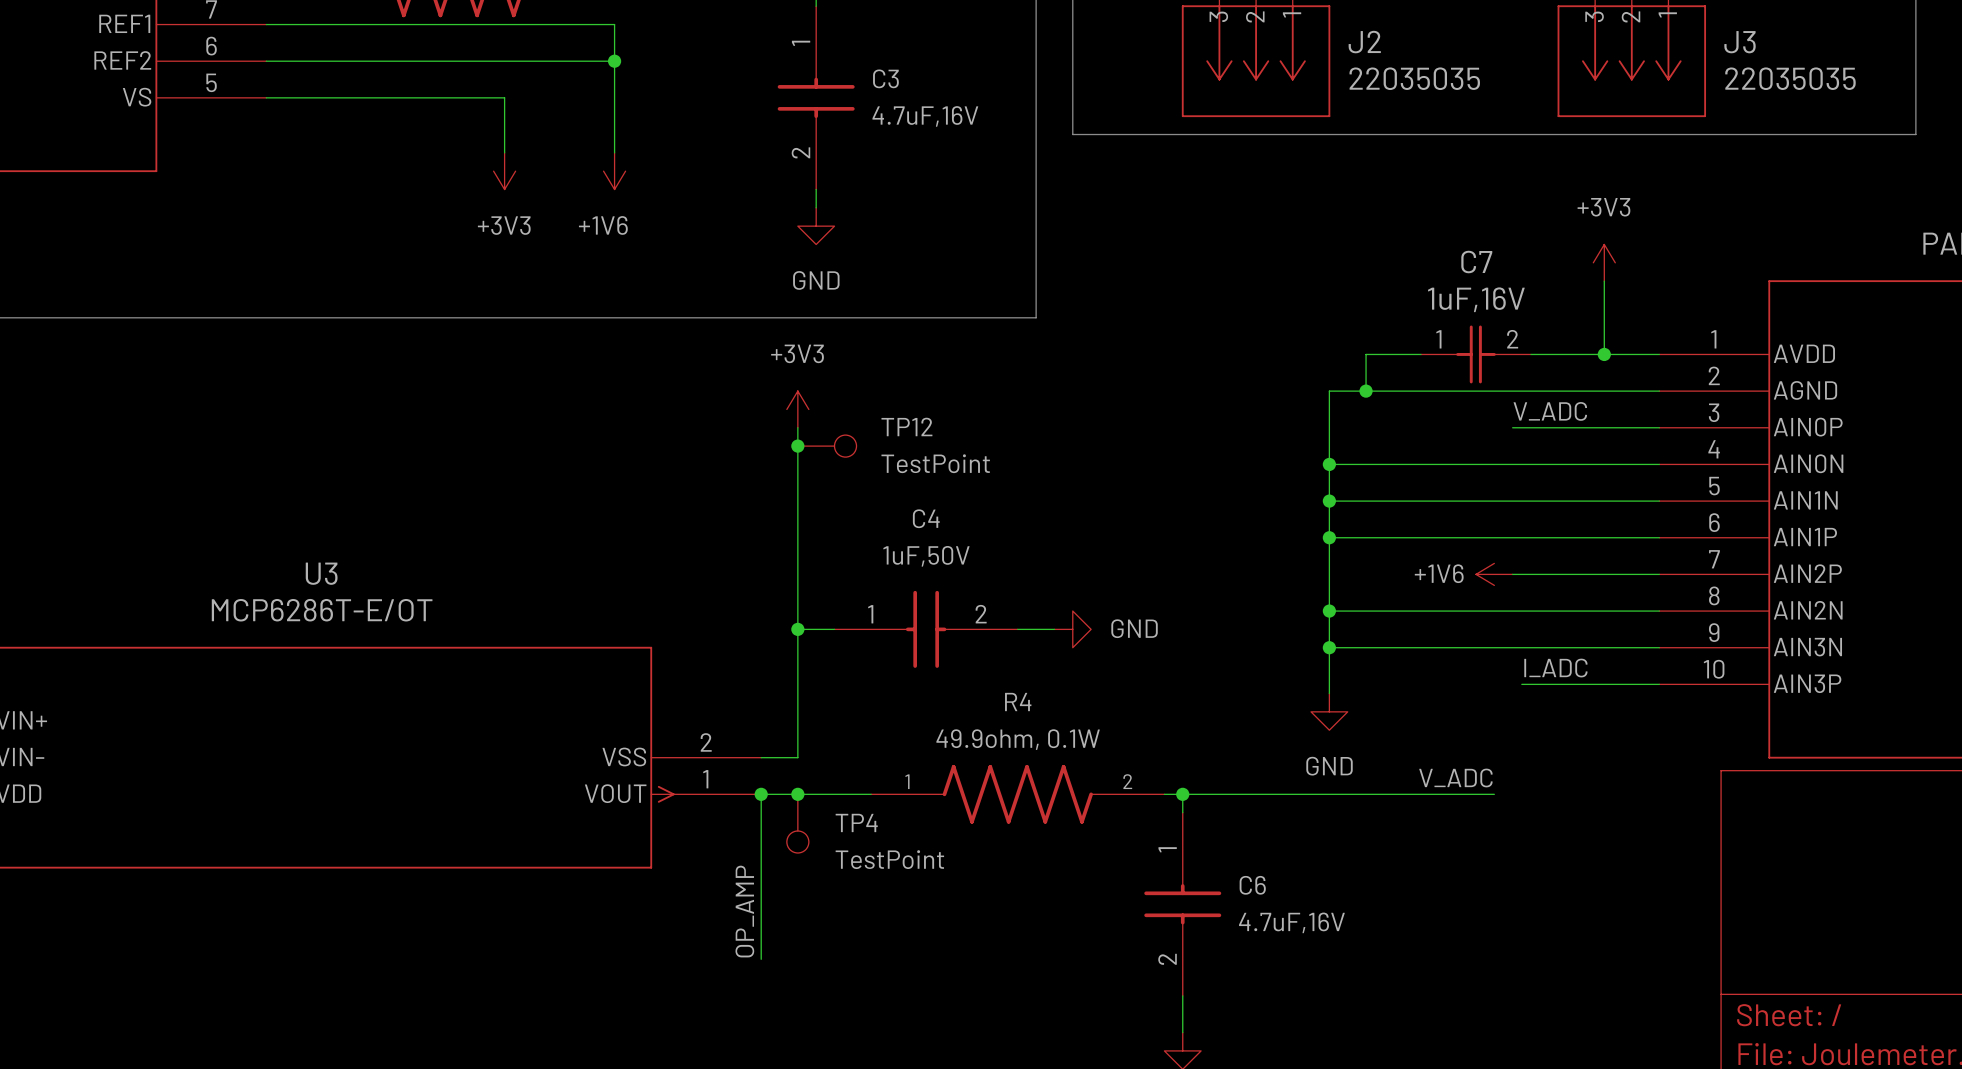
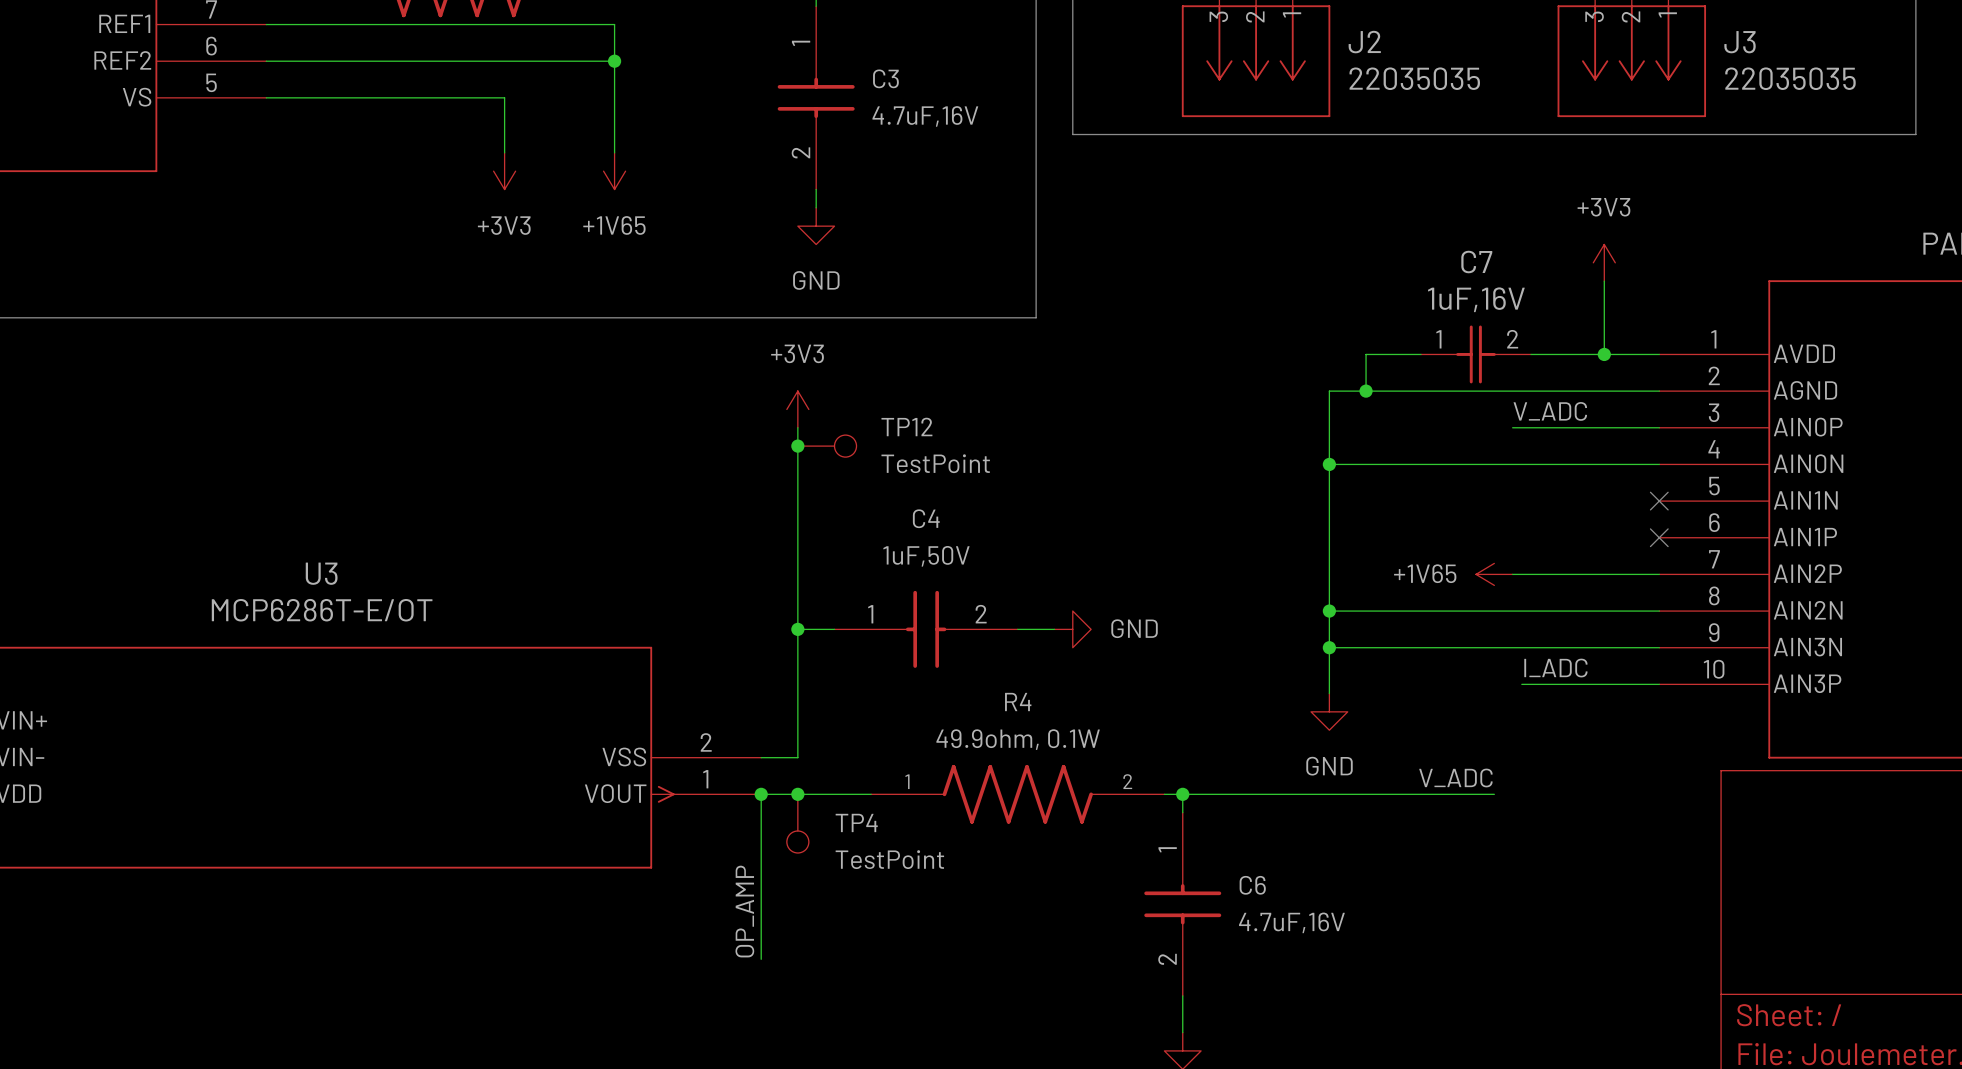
power symbol: +1V6 (614, 171) -> +1V65 (614, 171)
wire: (1329, 501) (1659, 501) -> none
junction: (1329, 501) -> none
no-connect mark: none -> (1659, 501)
wire: (1329, 537) (1659, 537) -> none
junction: (1329, 537) -> none
no-connect mark: none -> (1659, 537)
power symbol: +1V6 (1494, 574) -> +1V65 (1494, 574)

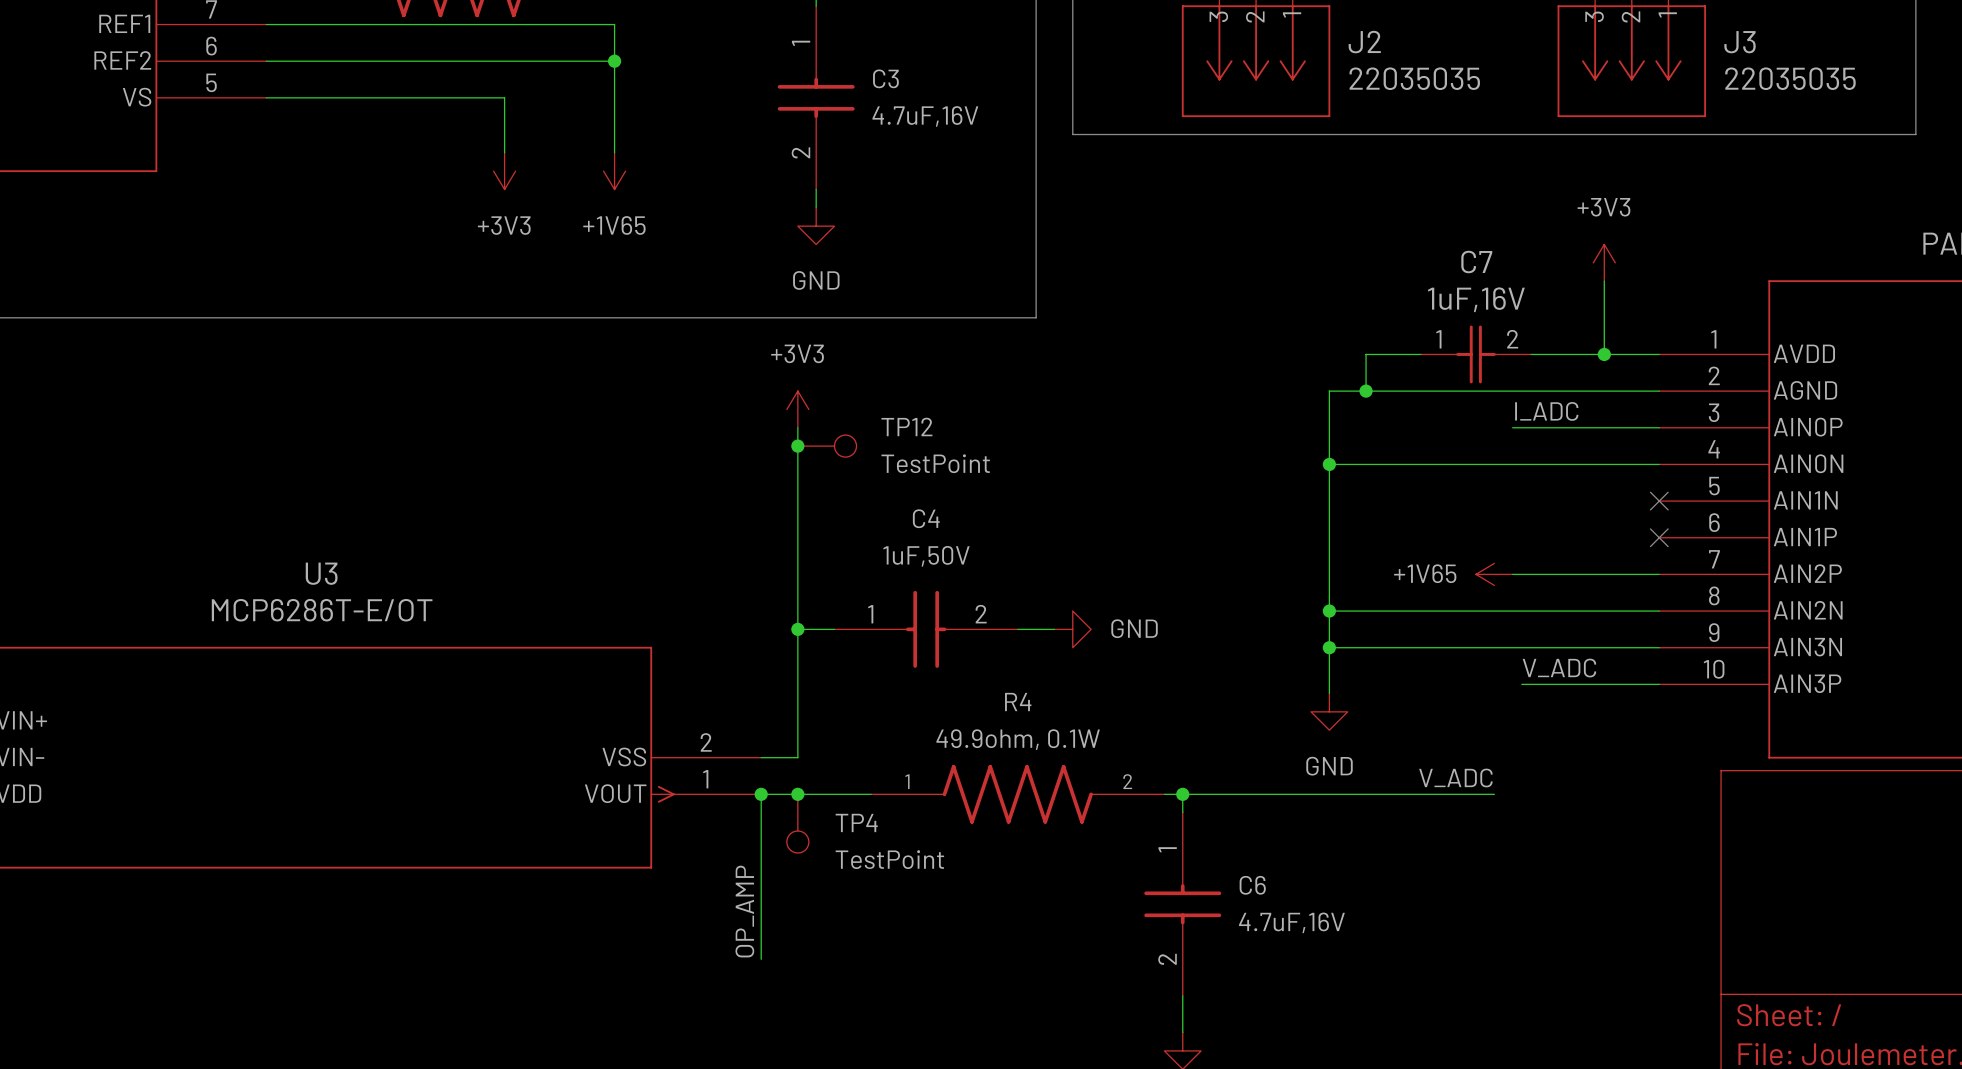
label: V_ADC (1550, 411) -> I_ADC (1546, 411)
label: I_ADC (1555, 668) -> V_ADC (1559, 668)

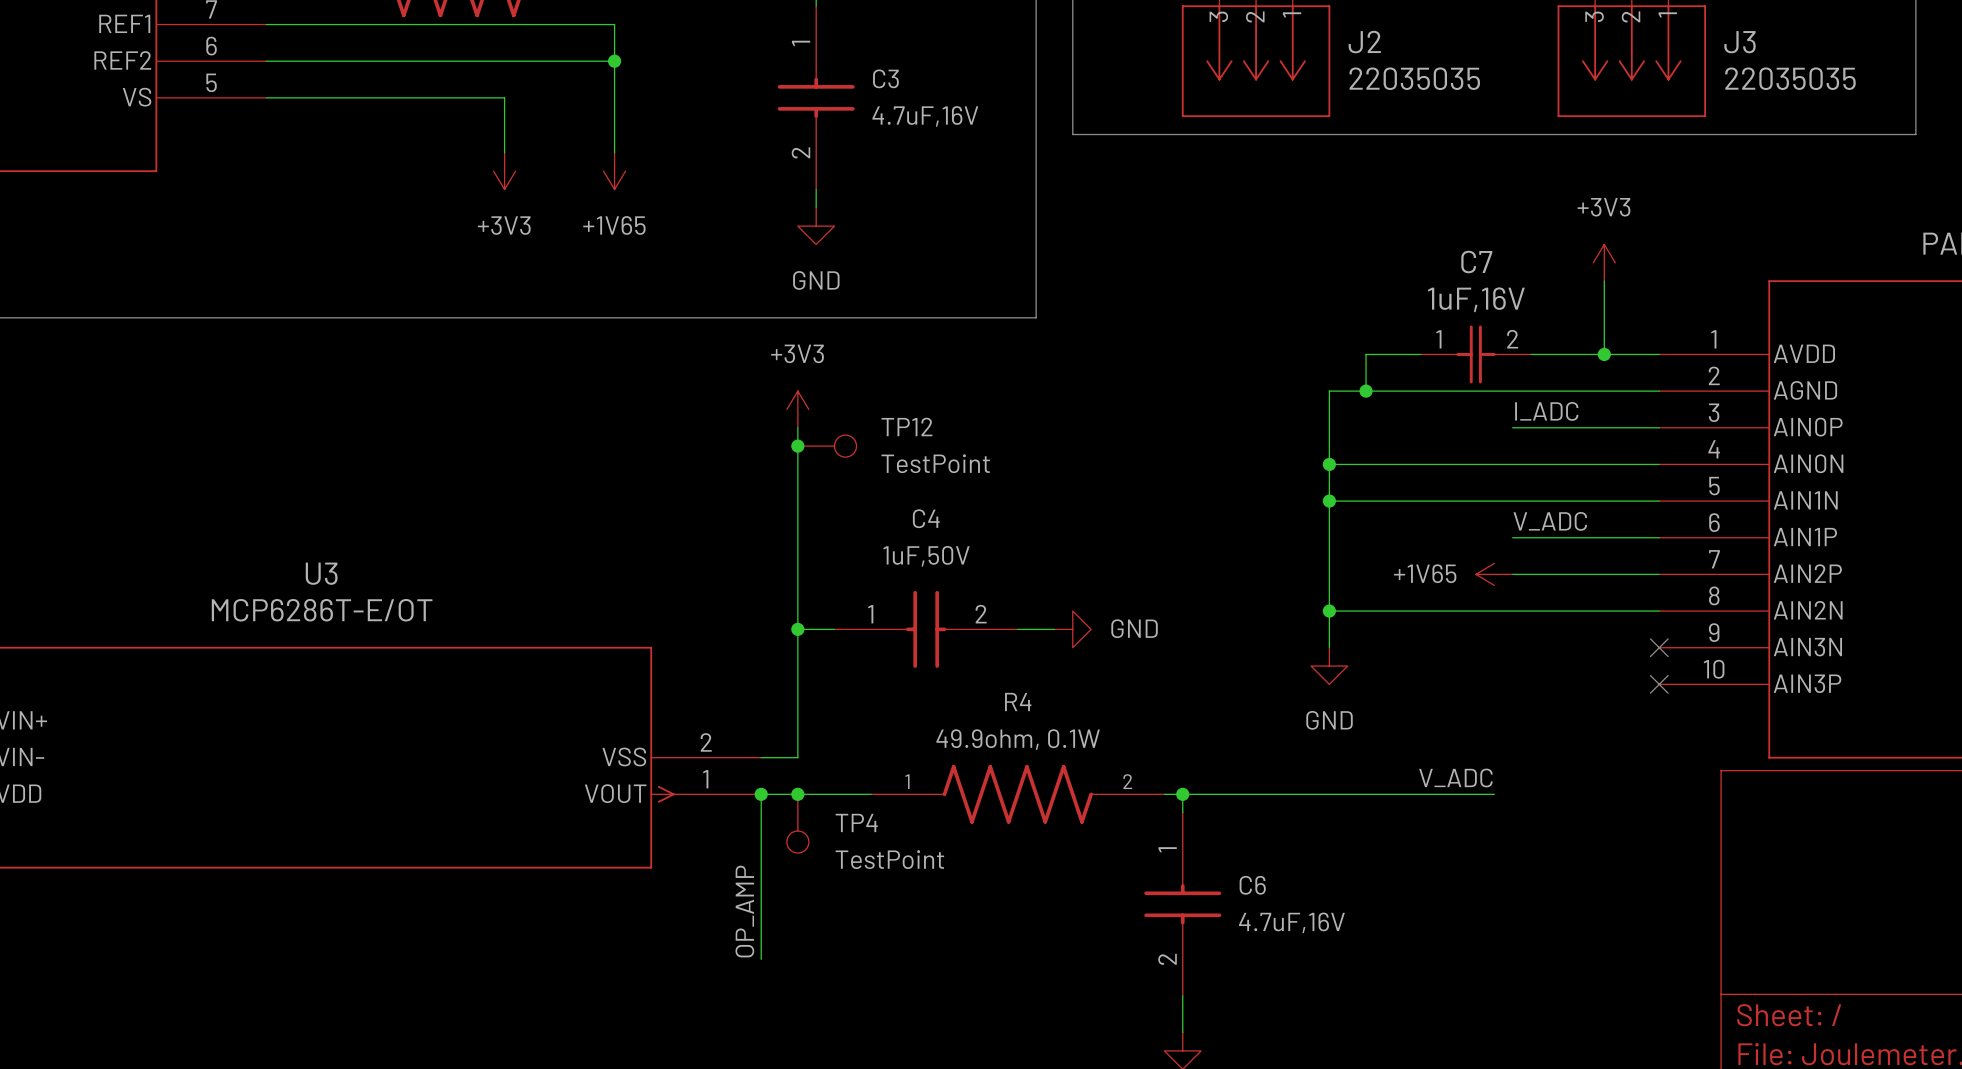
wire: none -> (1329, 501) (1659, 501)
junction: none -> (1329, 501)
no-connect mark: (1659, 501) -> none
wire: none -> (1512, 537) (1659, 537)
no-connect mark: (1659, 537) -> none
junction: (1329, 647) -> none
wire: (1659, 647) (1329, 647) (1329, 693) -> none
no-connect mark: none -> (1659, 647)
label position: V_ADC (1559, 668) -> V_ADC (1550, 521)
wire: (1521, 684) (1659, 684) -> none
no-connect mark: none -> (1659, 684)
power symbol position: GND (1329, 711) -> GND (1329, 666)

